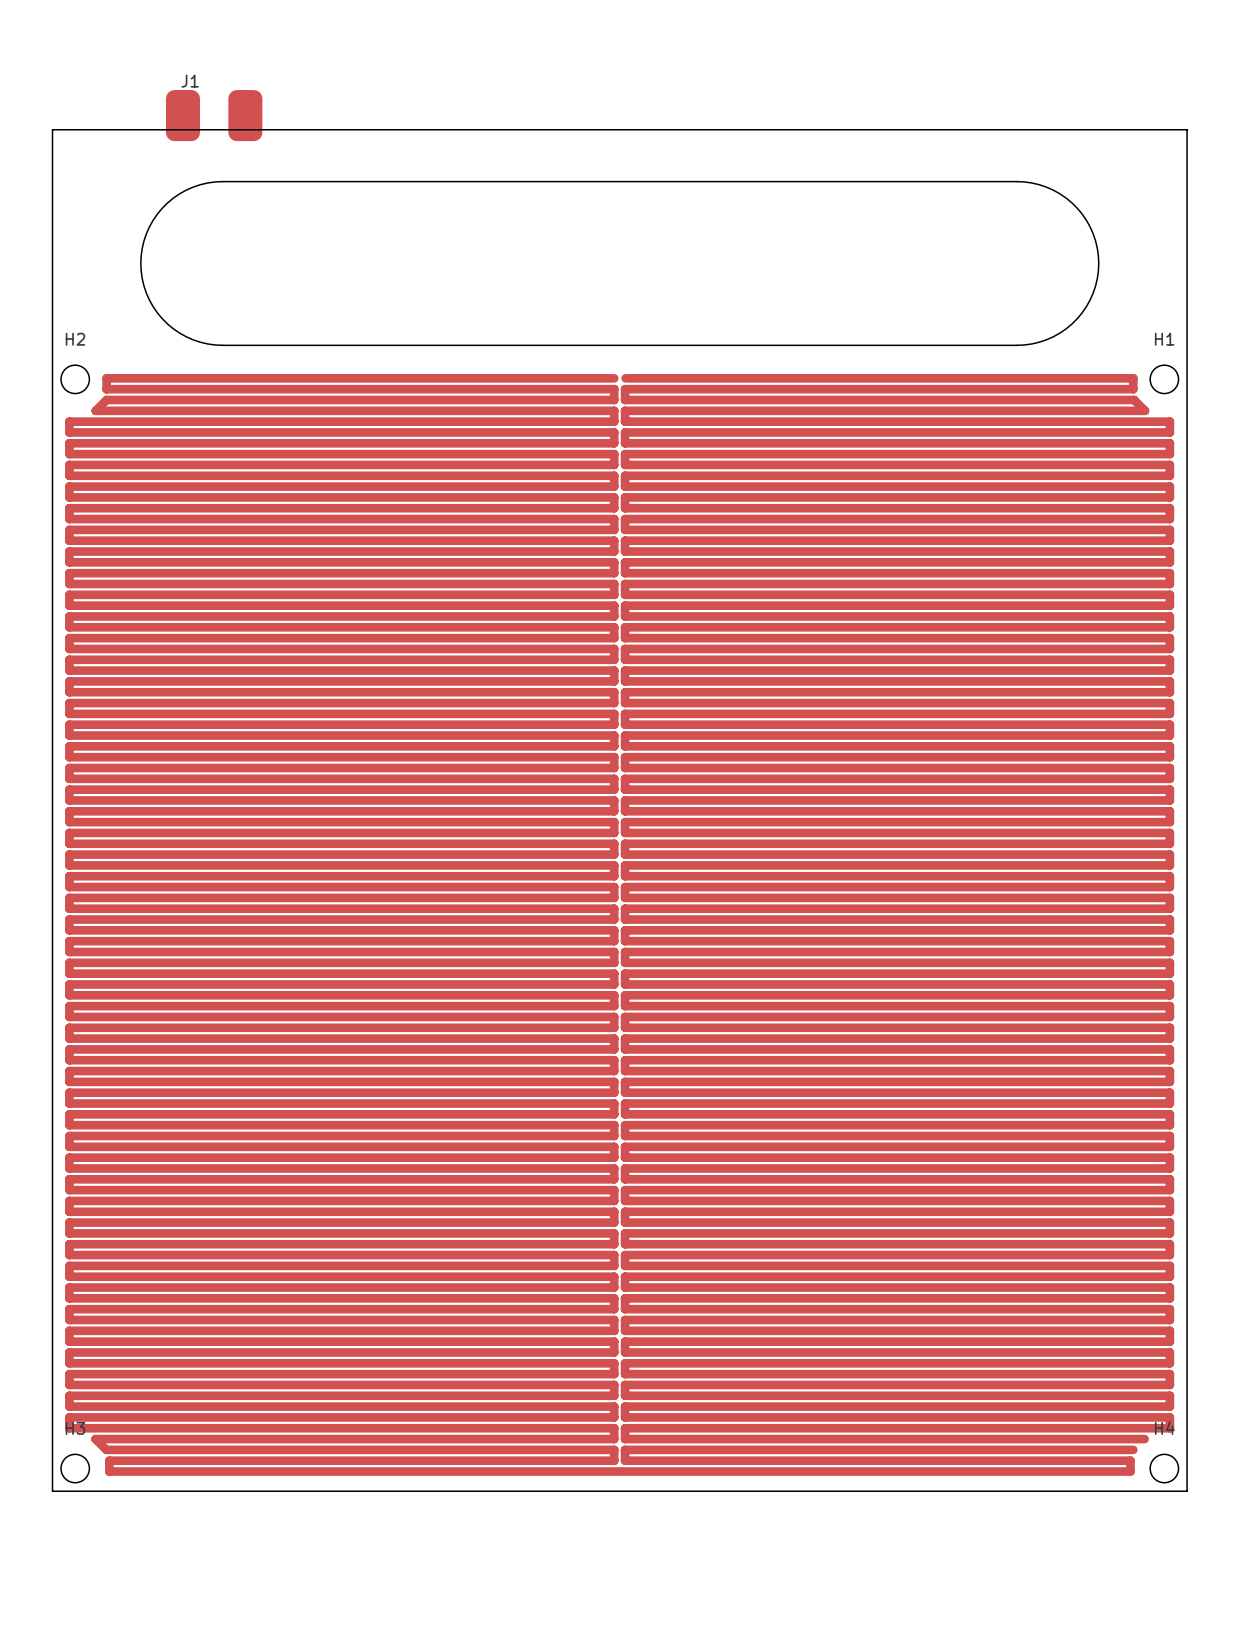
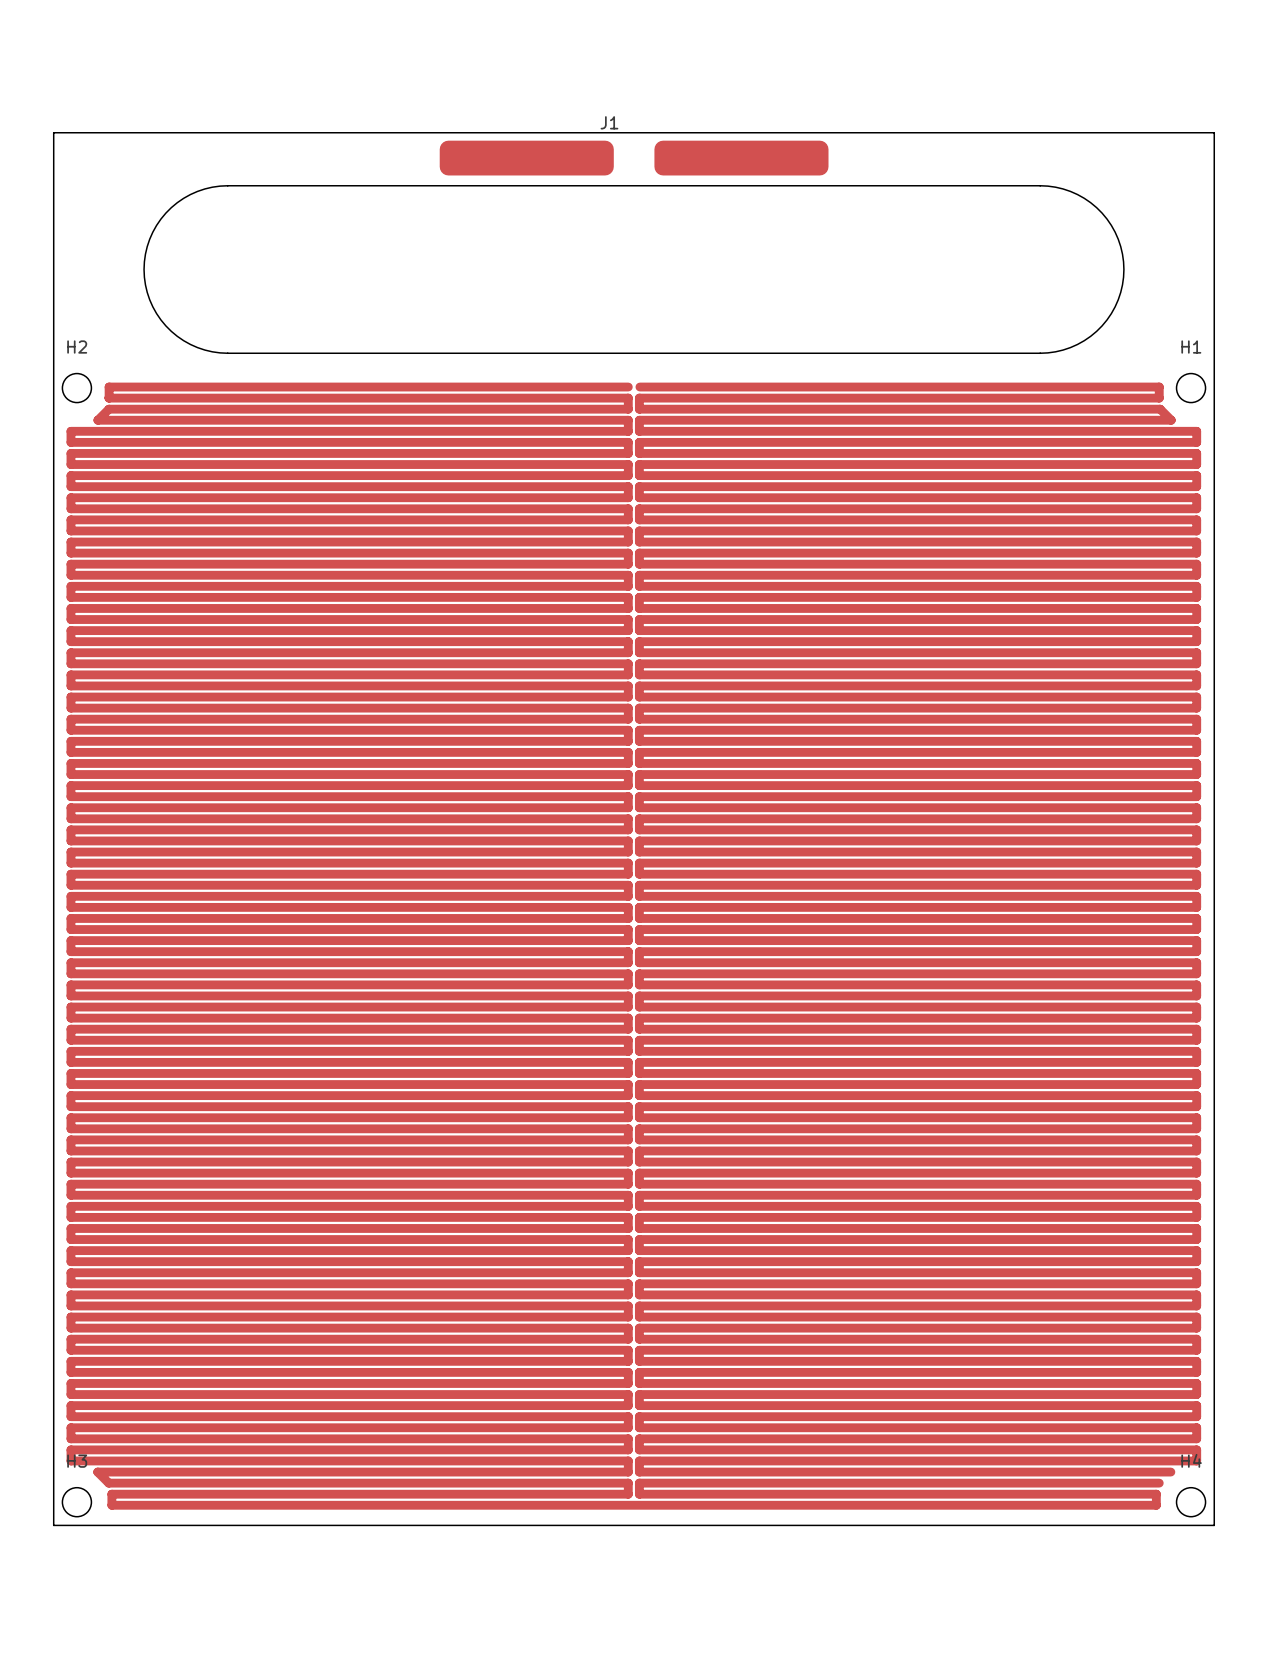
J1 footprint: [165, 90, 263, 142] -> [439, 140, 829, 176]

